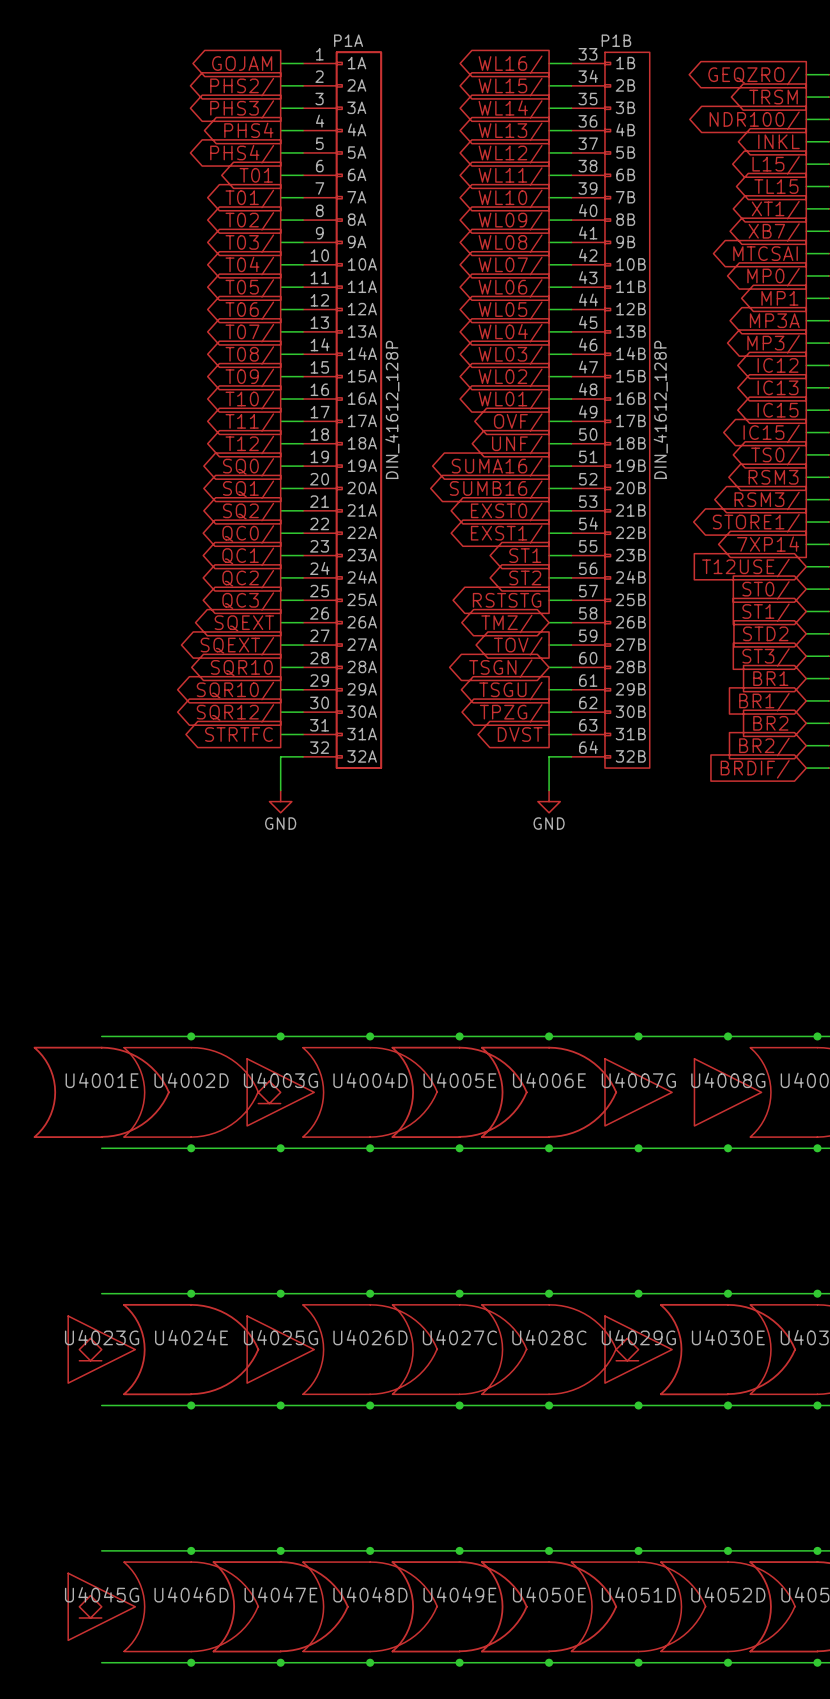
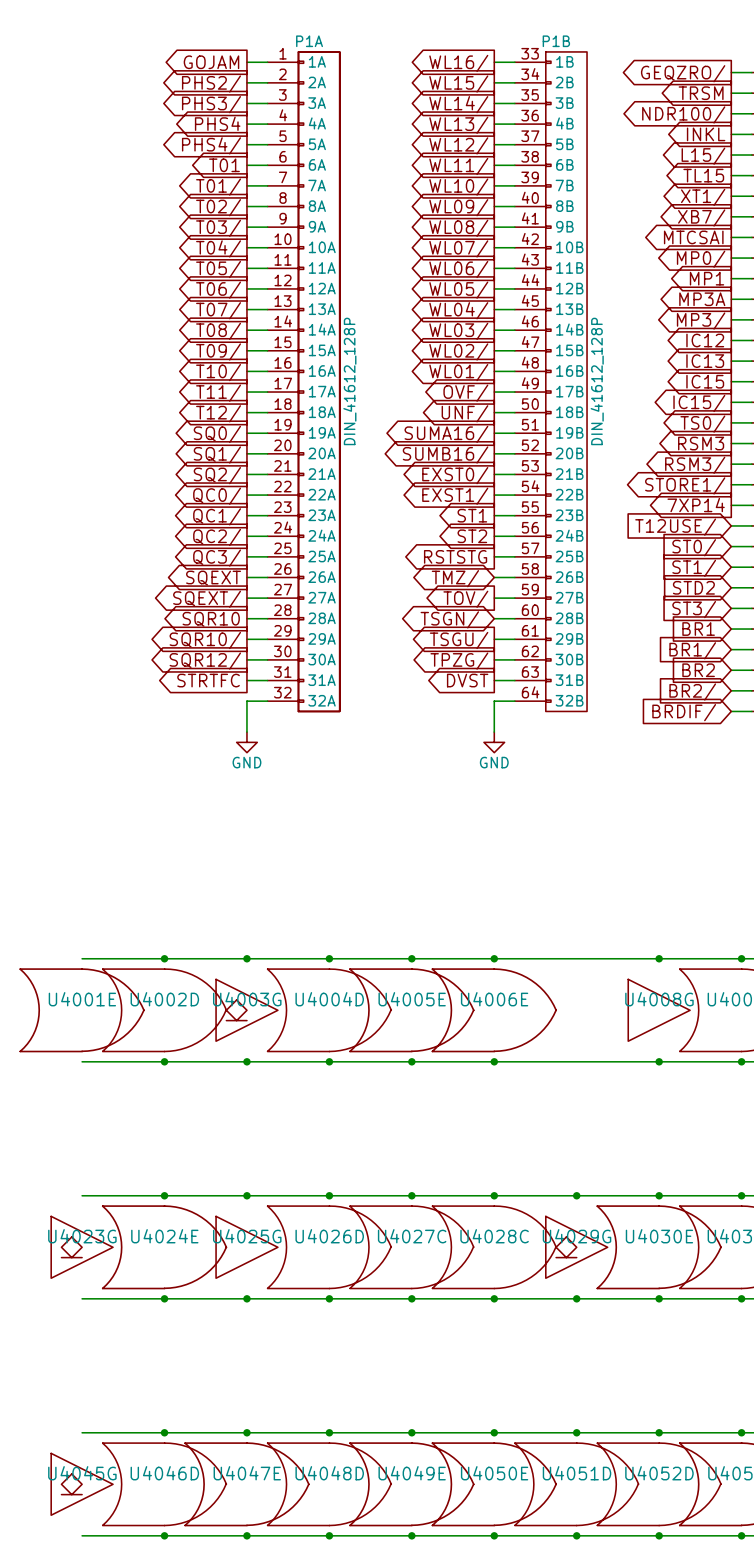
junction: (638, 1036) -> none
U4007G: (638, 1092) -> none
junction: (638, 1148) -> none

